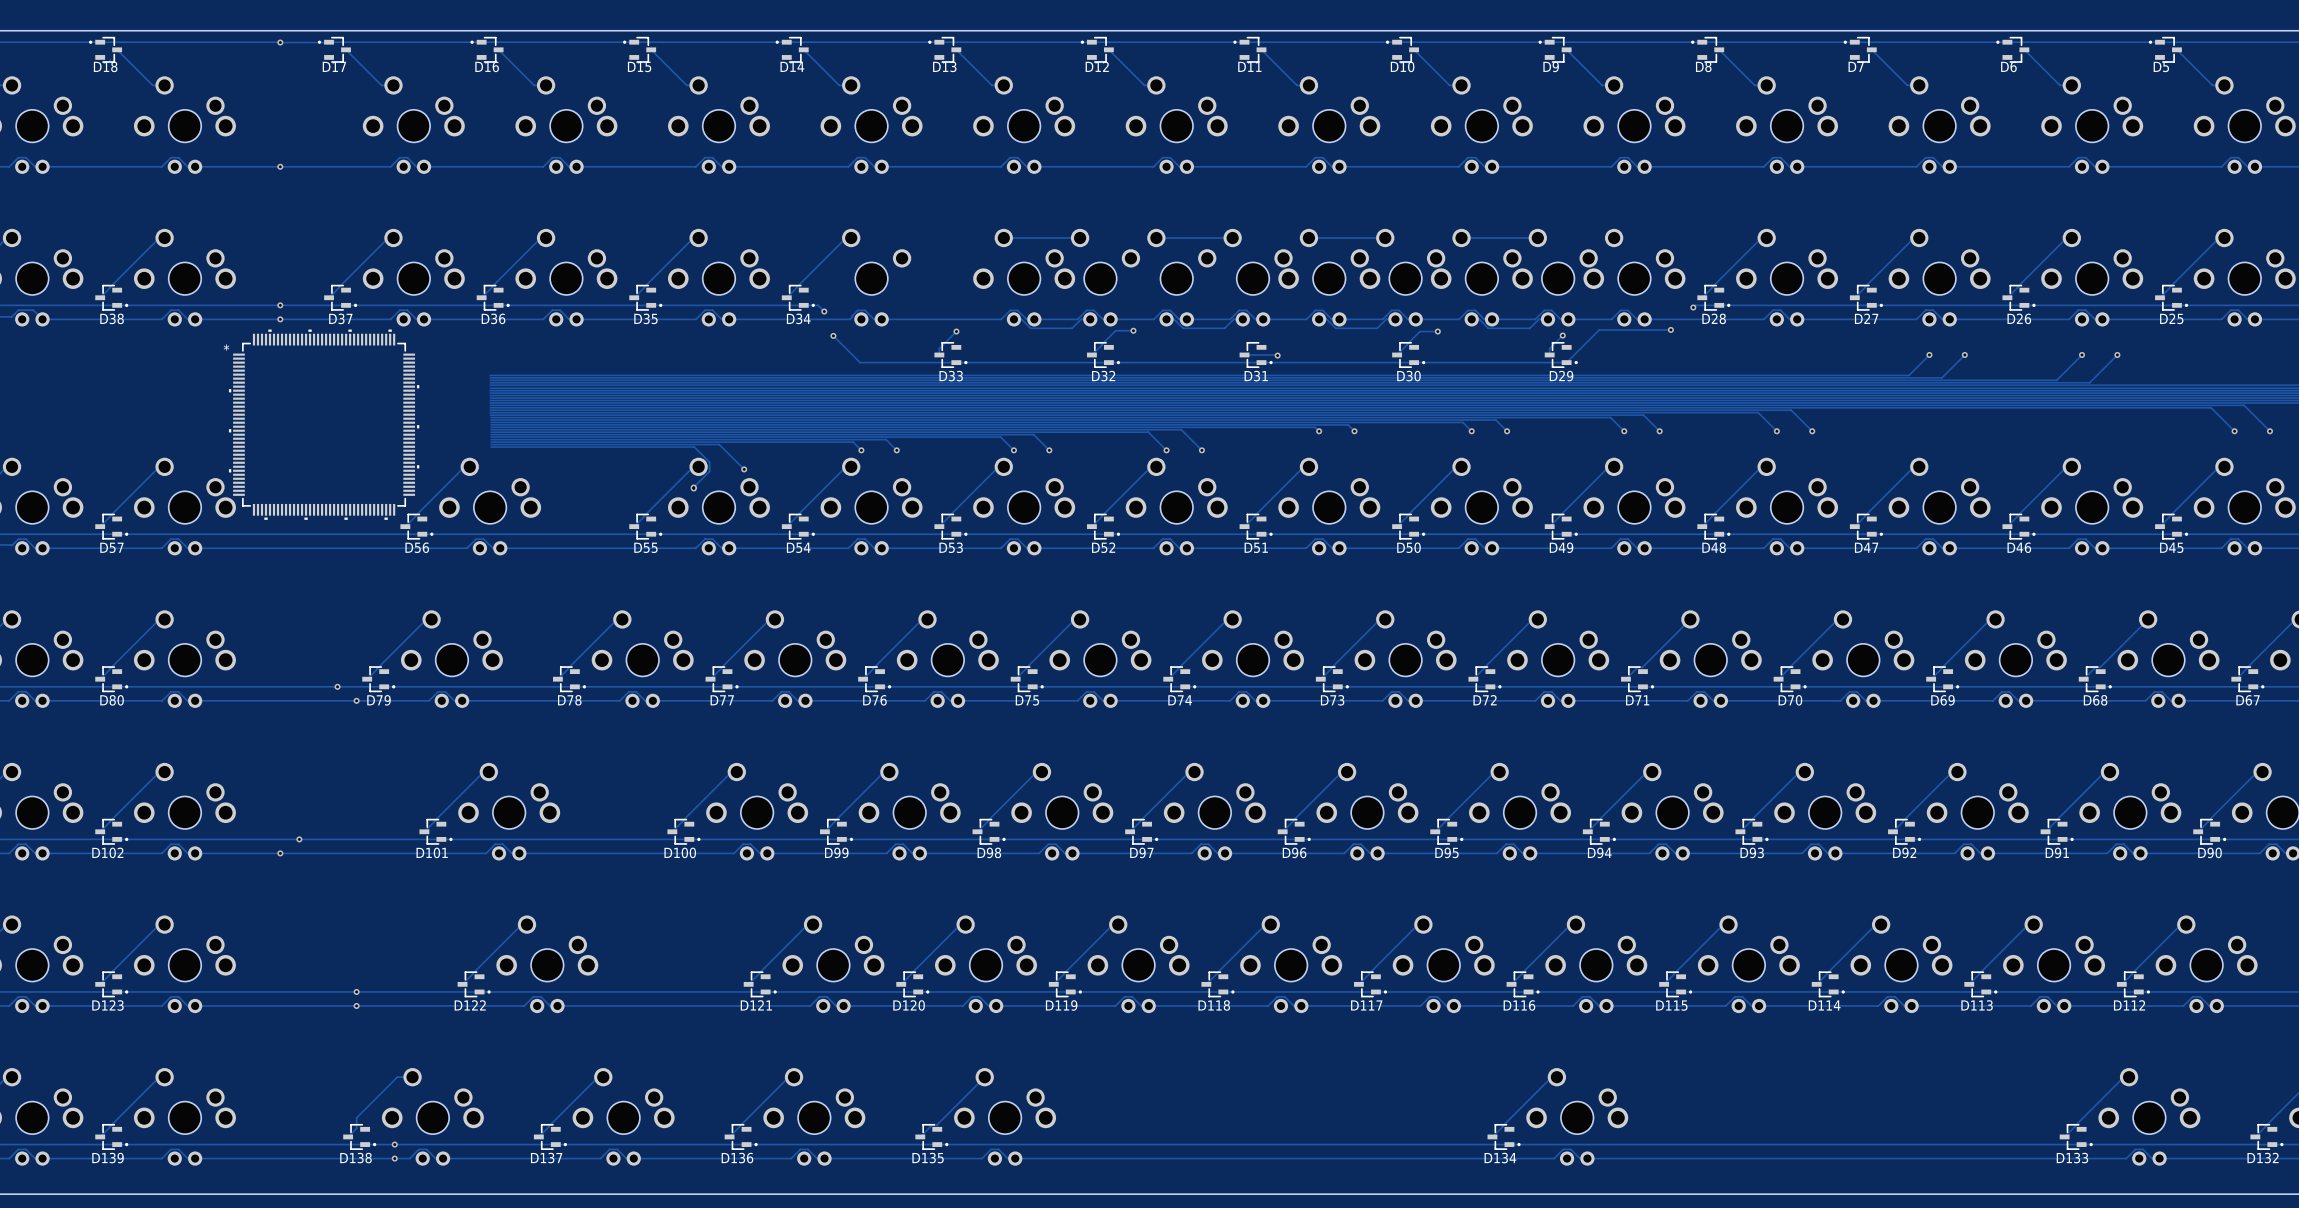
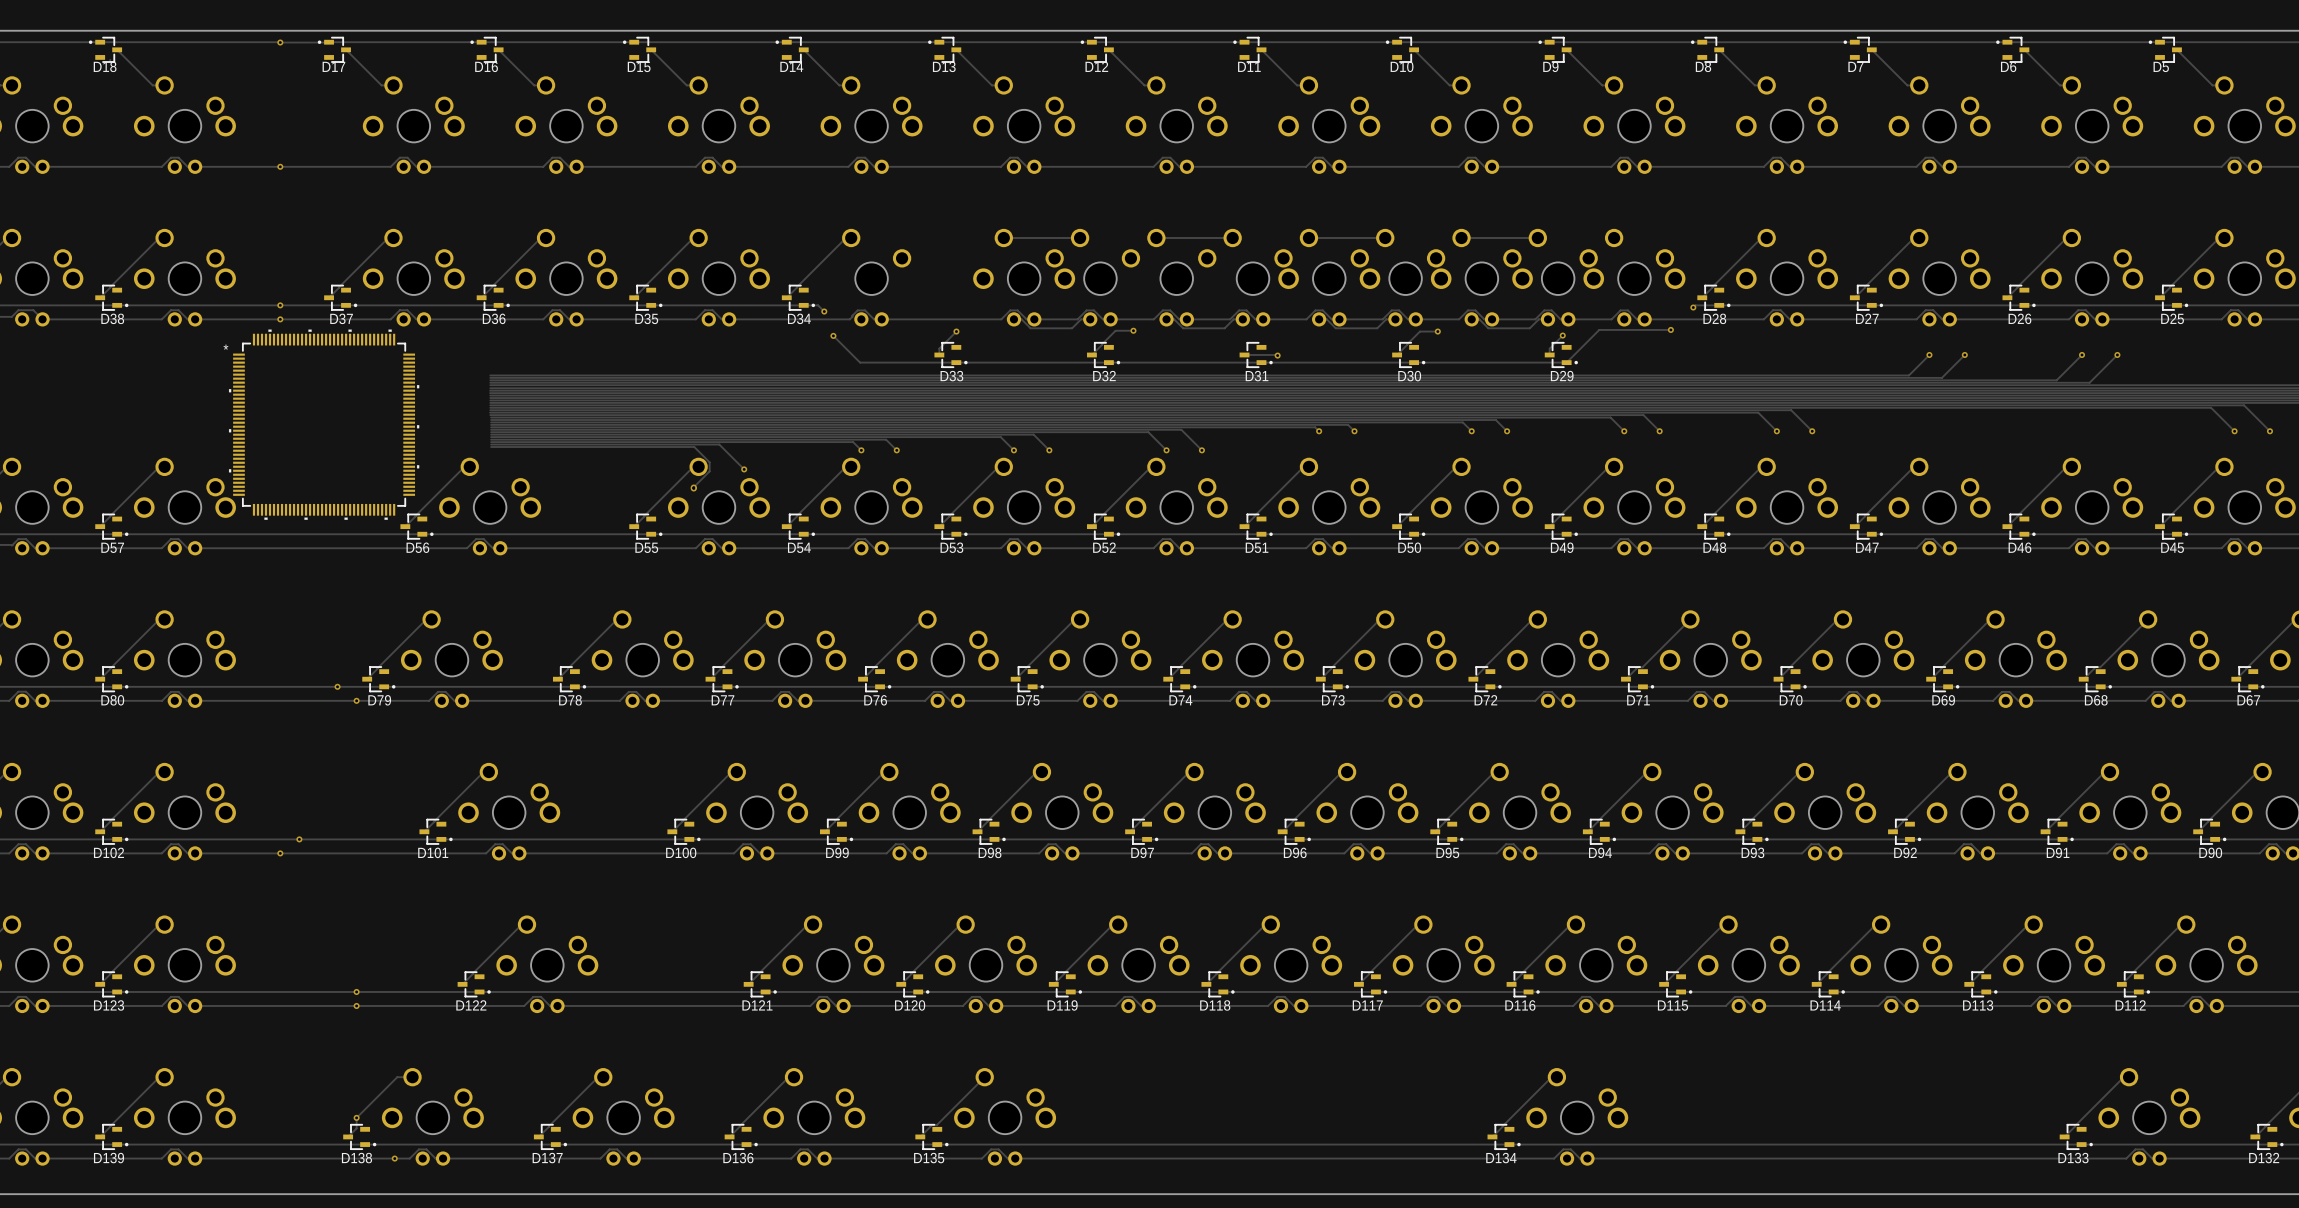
via position: (394, 1144) -> (356, 1117)

